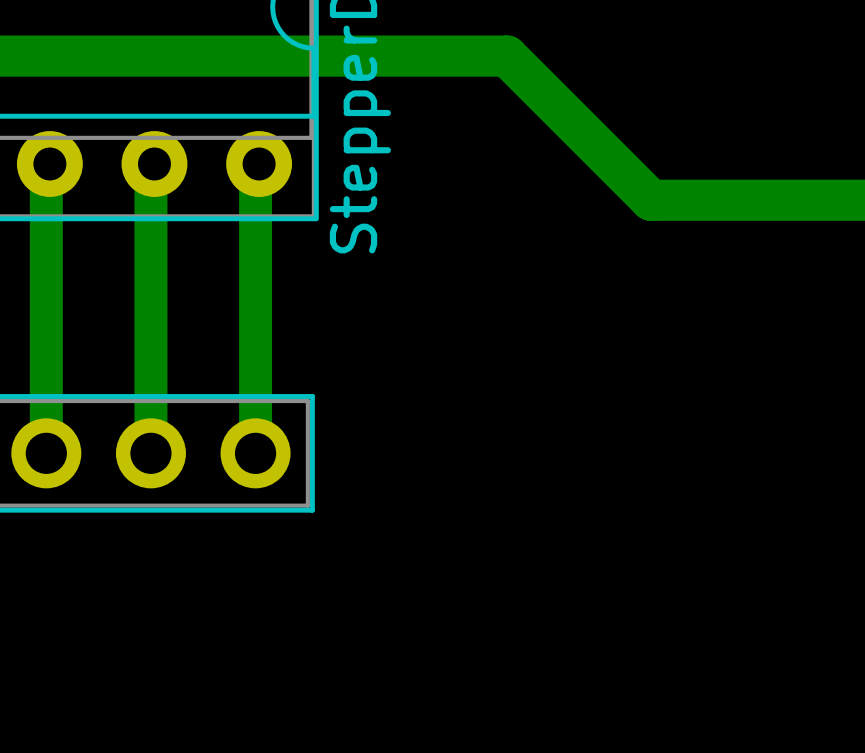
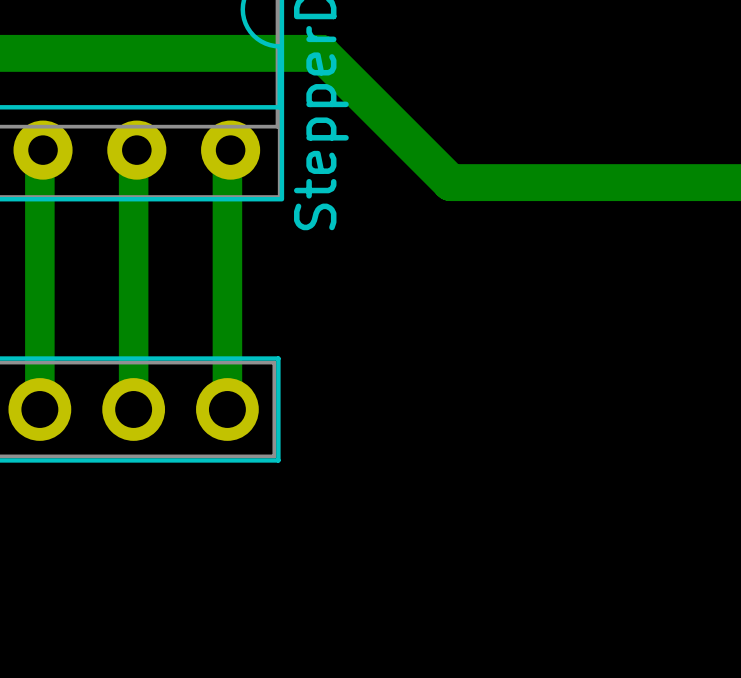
bottom track: (360, 56) (506, 56) (651, 200) -> (321, 53) (450, 182) (581, 182)

